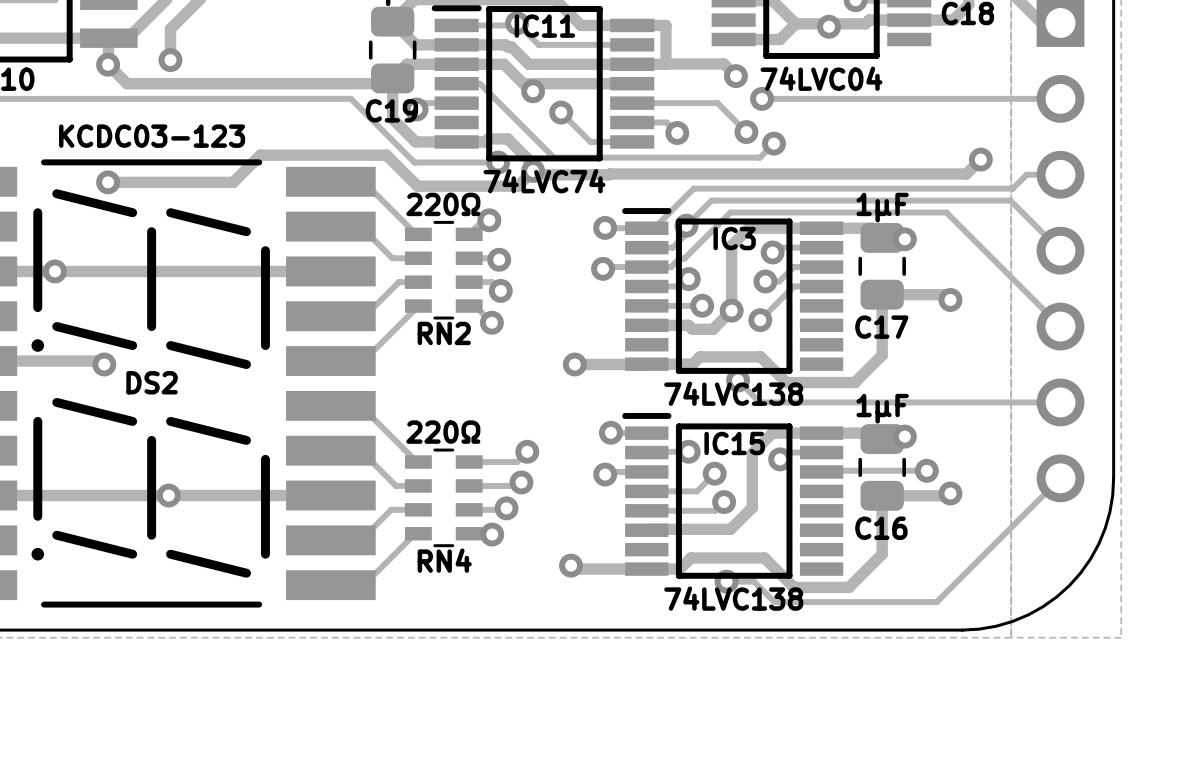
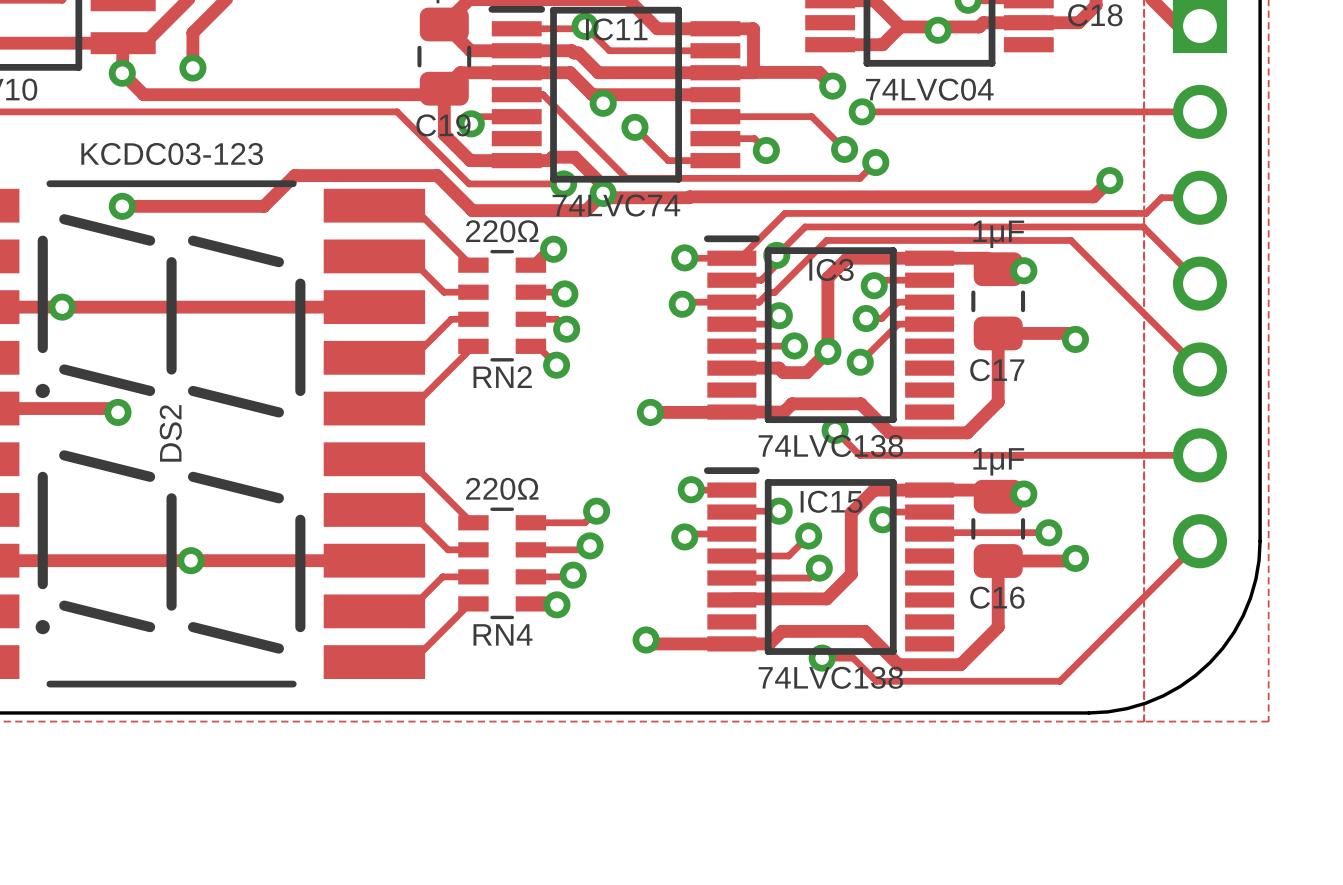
DS2 name rotation: 0° (152, 382) -> 90° counterclockwise (170, 433)

